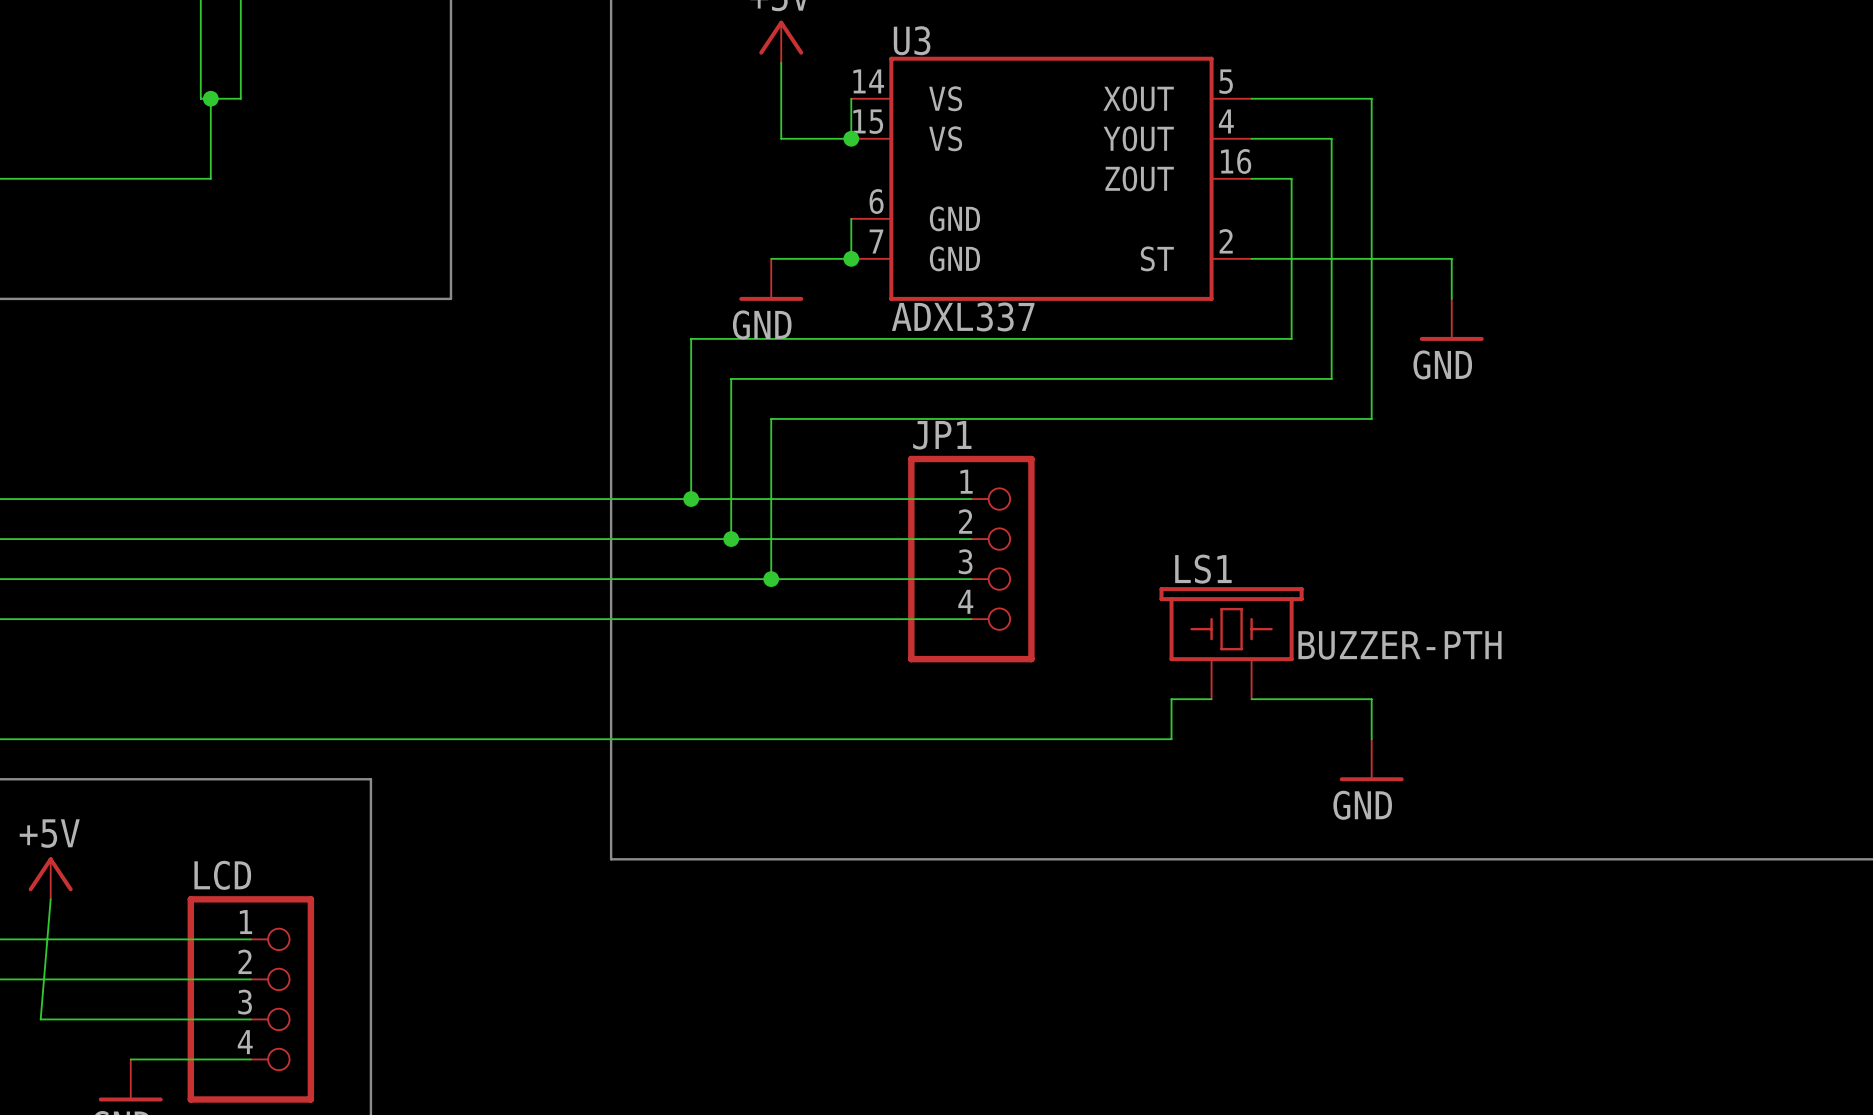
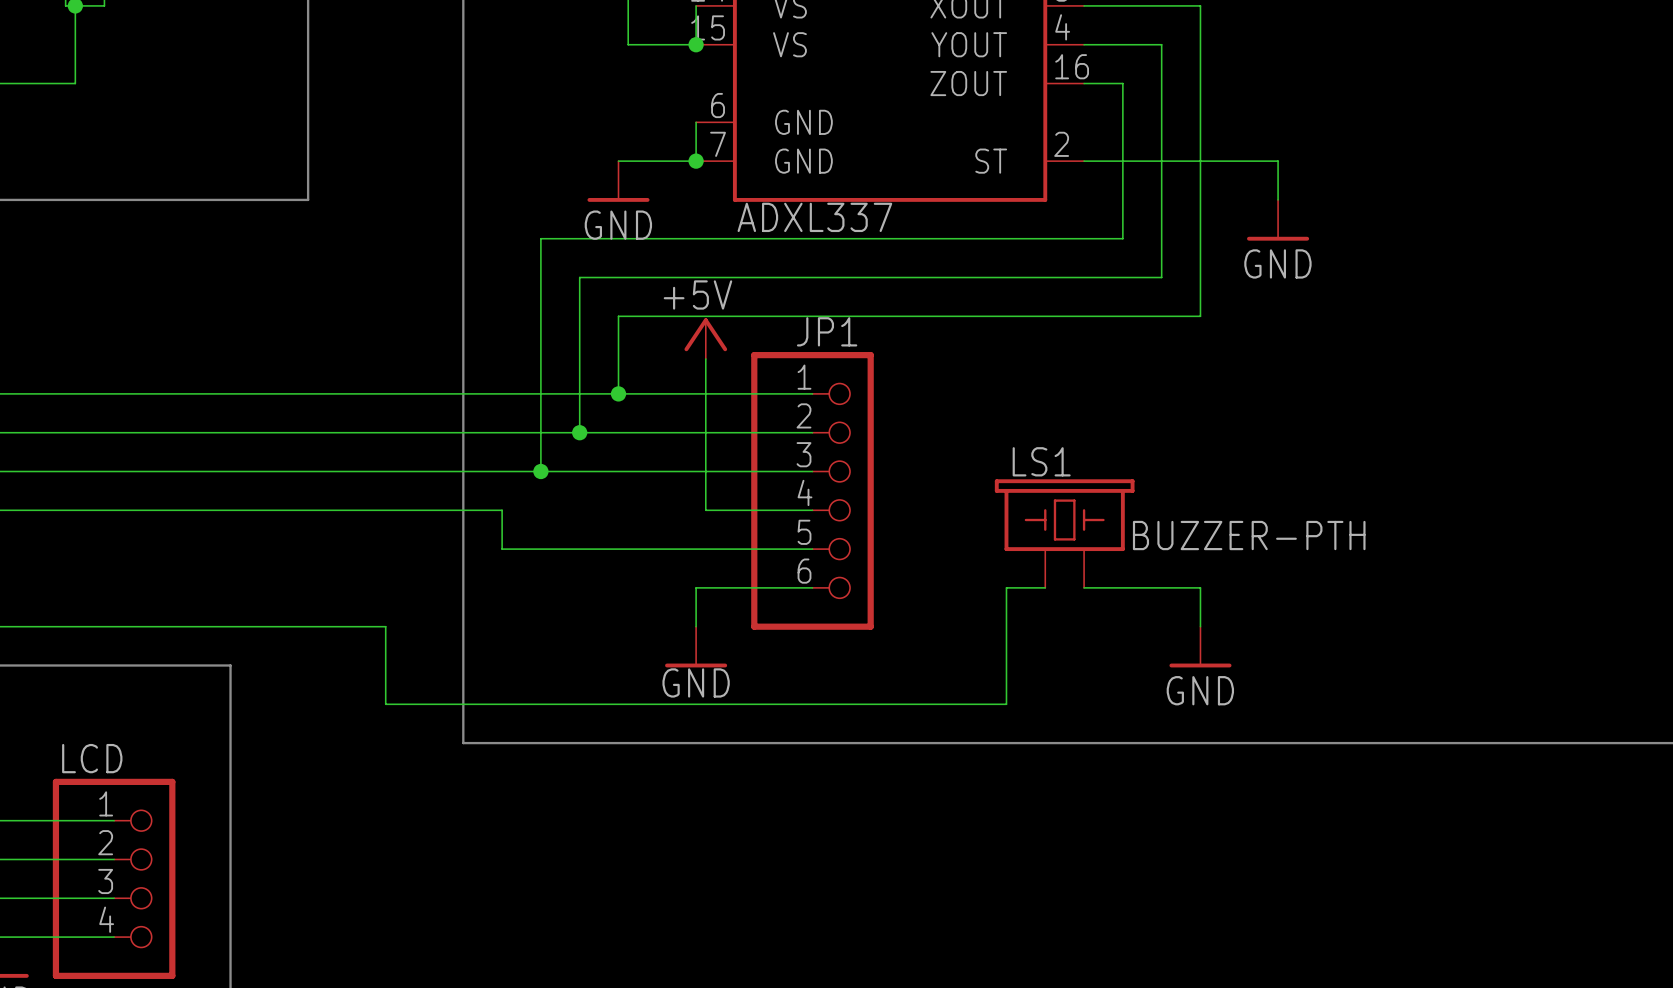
JP1 name position: JP1 (942, 435) -> JP1 (827, 331)
power symbol: none -> +5V (705, 338)
JP1 symbol: [908, 455, 1035, 663] -> [751, 352, 874, 630]
wire: none -> (705, 358) (705, 510)
junction: (691, 499) -> none
wire: (771, 499) (771, 579) -> (540, 393) (540, 471)
junction: none -> (618, 393)
junction: none -> (540, 471)
junction: (771, 579) -> none
wire: (651, 619) (861, 619) -> (502, 510) (502, 549) (812, 549)
wire: none -> (812, 587) (696, 587) (696, 626)
wire: (531, 739) (1171, 739) -> (385, 626) (385, 704) (1006, 704) (1006, 626)
power symbol: none -> GND (696, 647)

